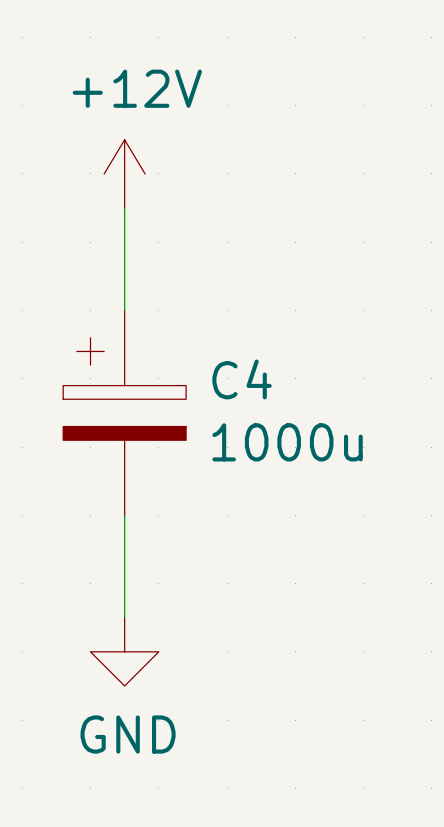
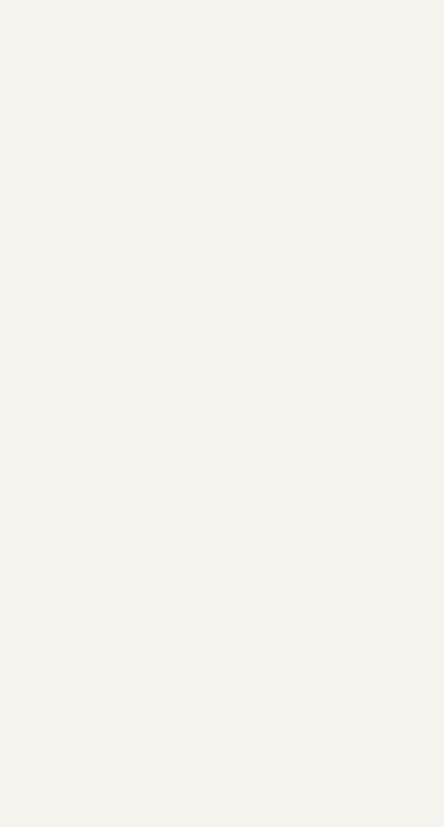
power symbol: +12V (124, 173) -> none
wire: (124, 208) (124, 310) -> none
C4: 1000u (124, 412) -> none
wire: (124, 515) (124, 617) -> none
power symbol: GND (124, 651) -> none

